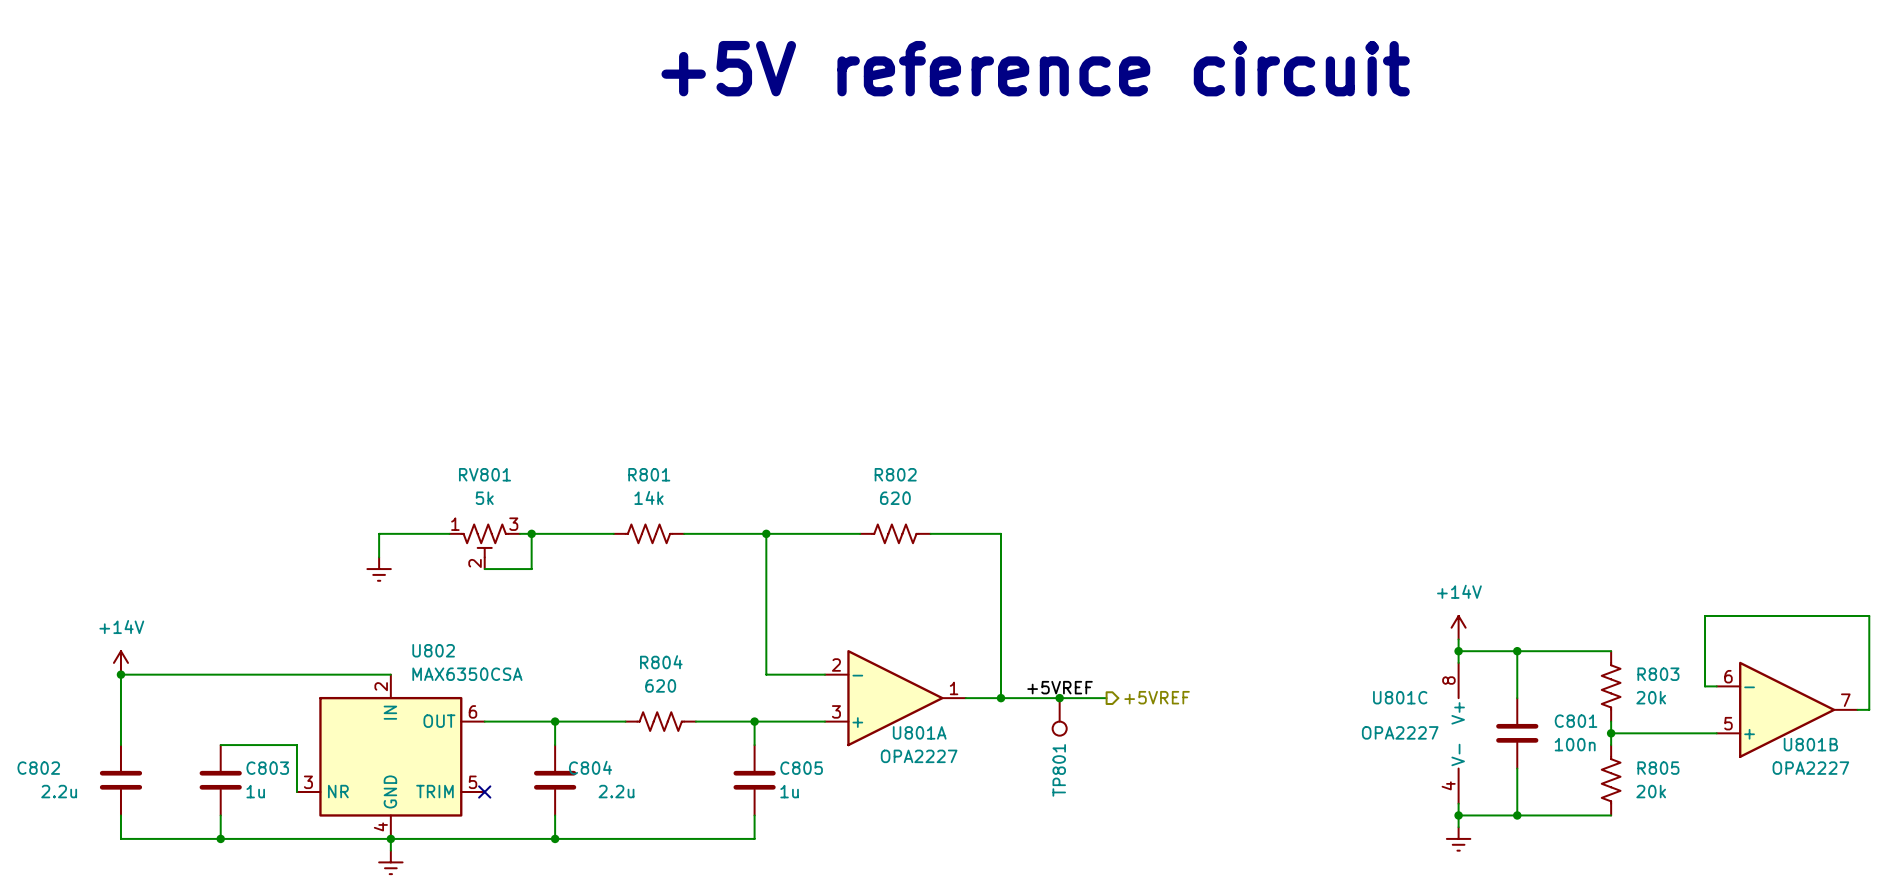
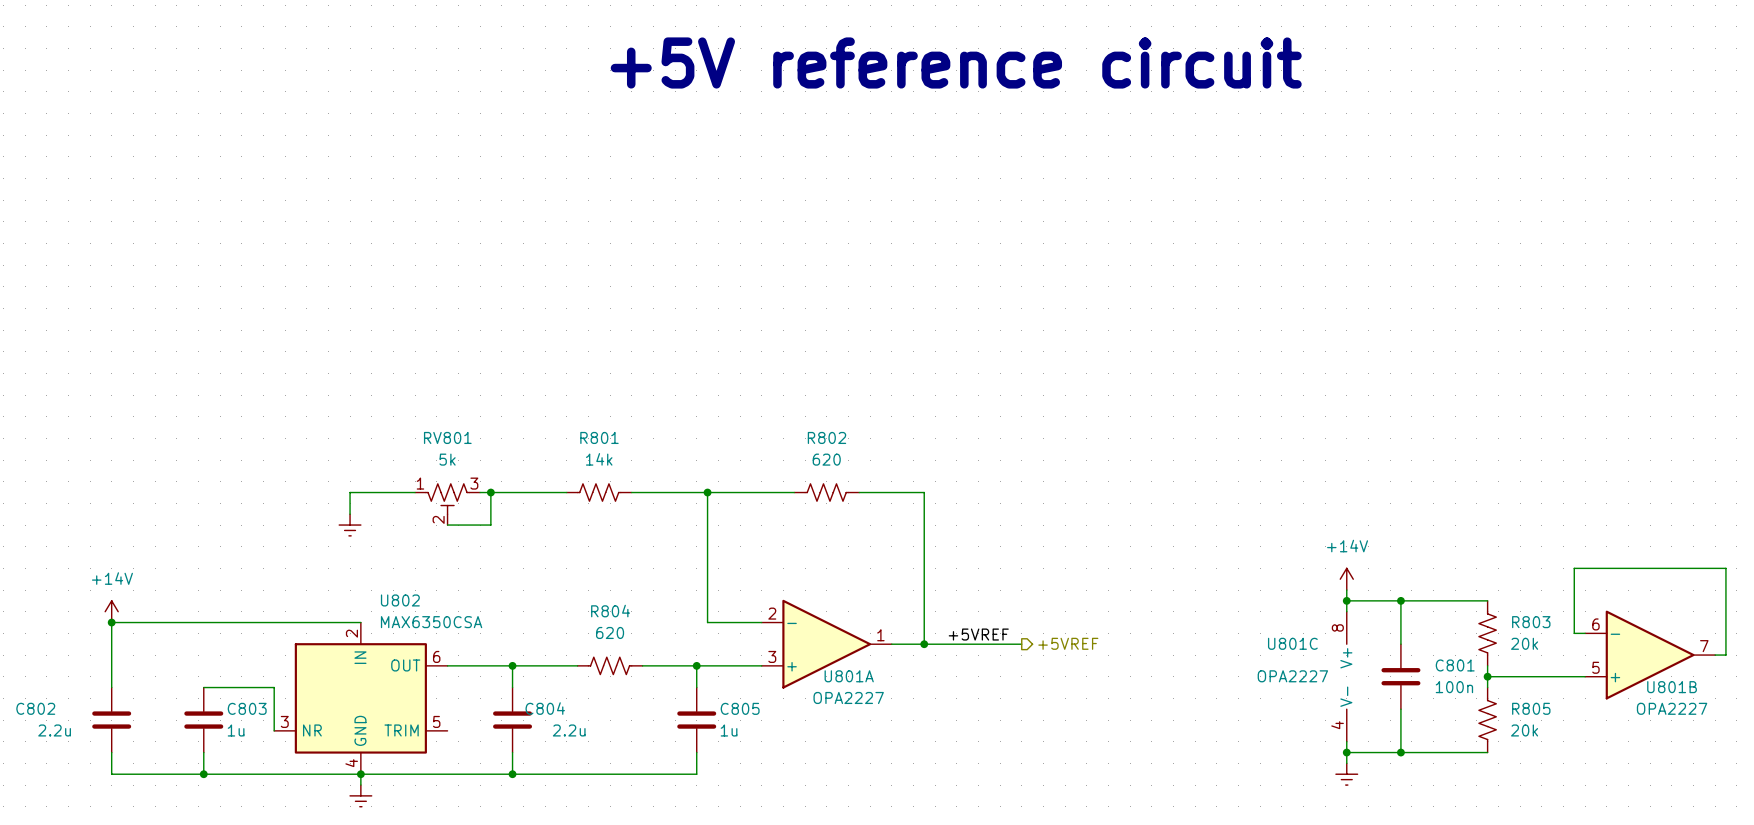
junction: (1059, 698) -> none
TP801: (1059, 716) -> none
no-connect mark: (484, 791) -> none

